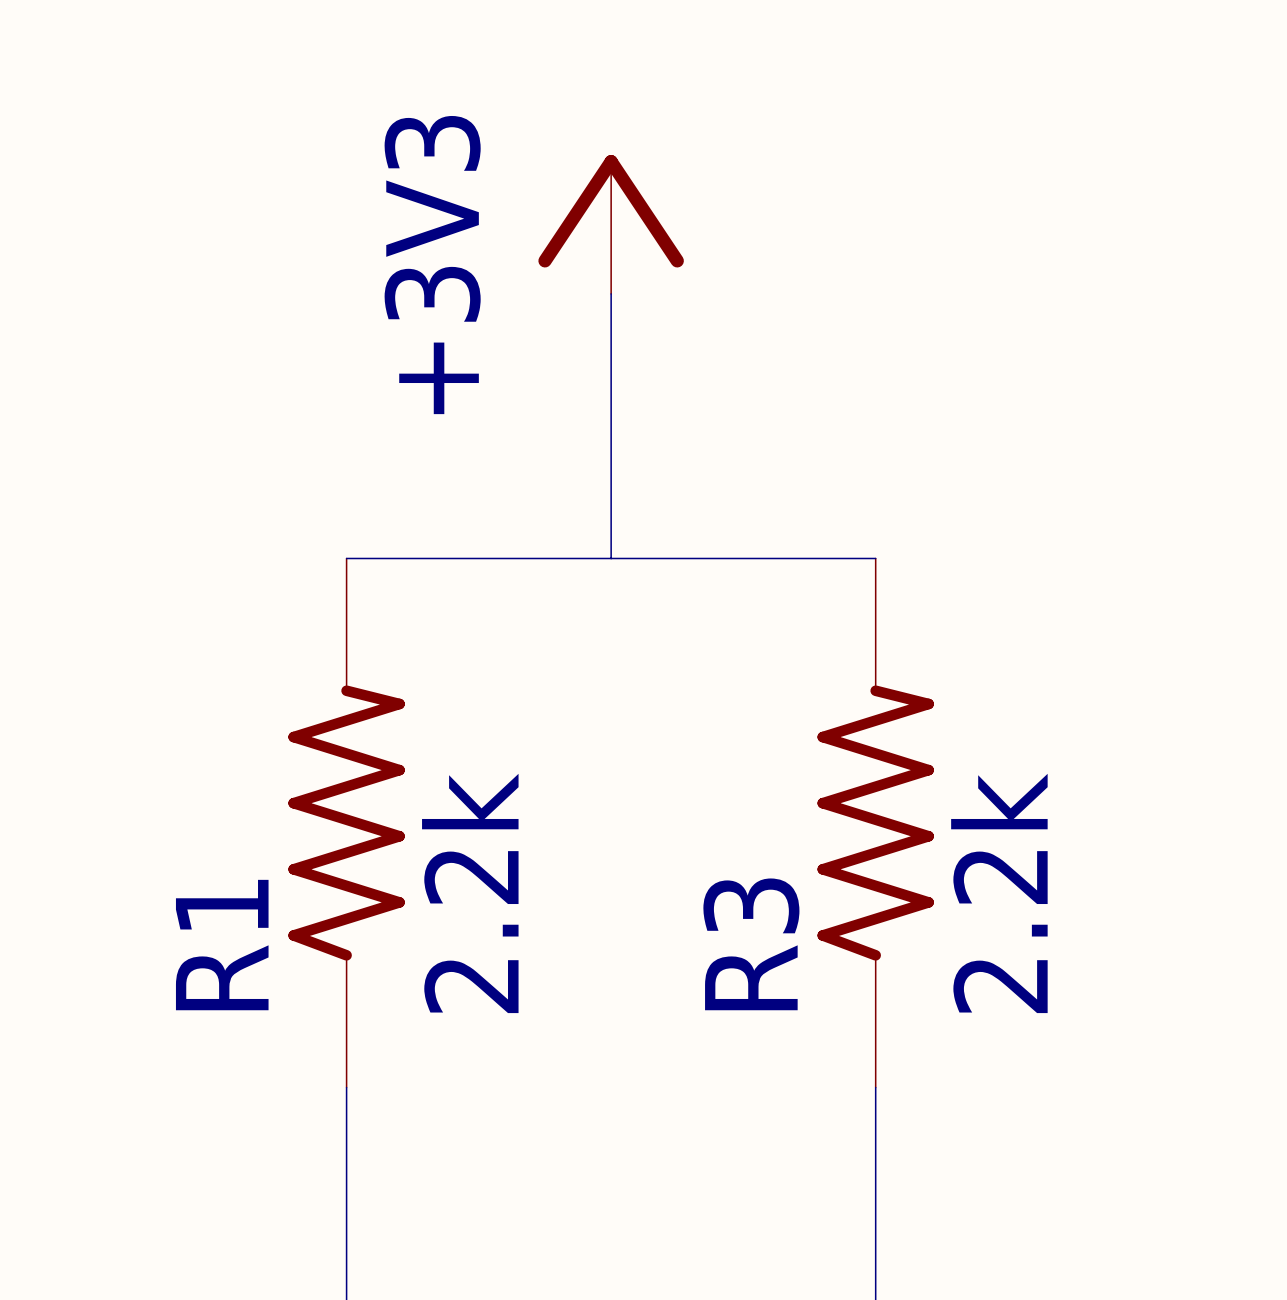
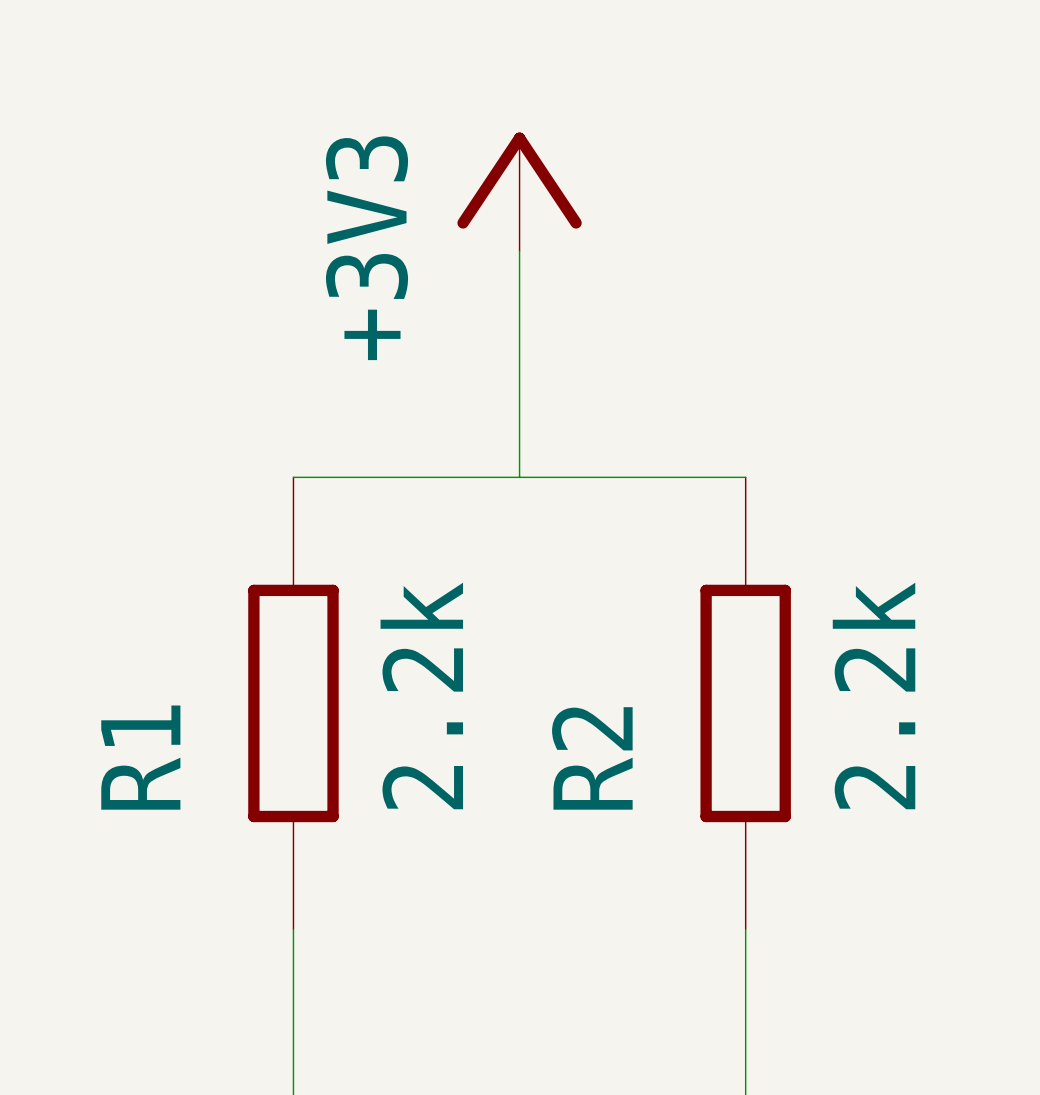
R1 symbol: [288, 558, 405, 1088] -> [248, 477, 339, 930]
R3: 2.2k (875, 823) -> none
R2: none -> 2.2k (745, 703)
R1 value position: 2.2k (470, 893) -> 2.2k (421, 695)
R1 name position: R1 (222, 945) -> R1 (140, 757)

